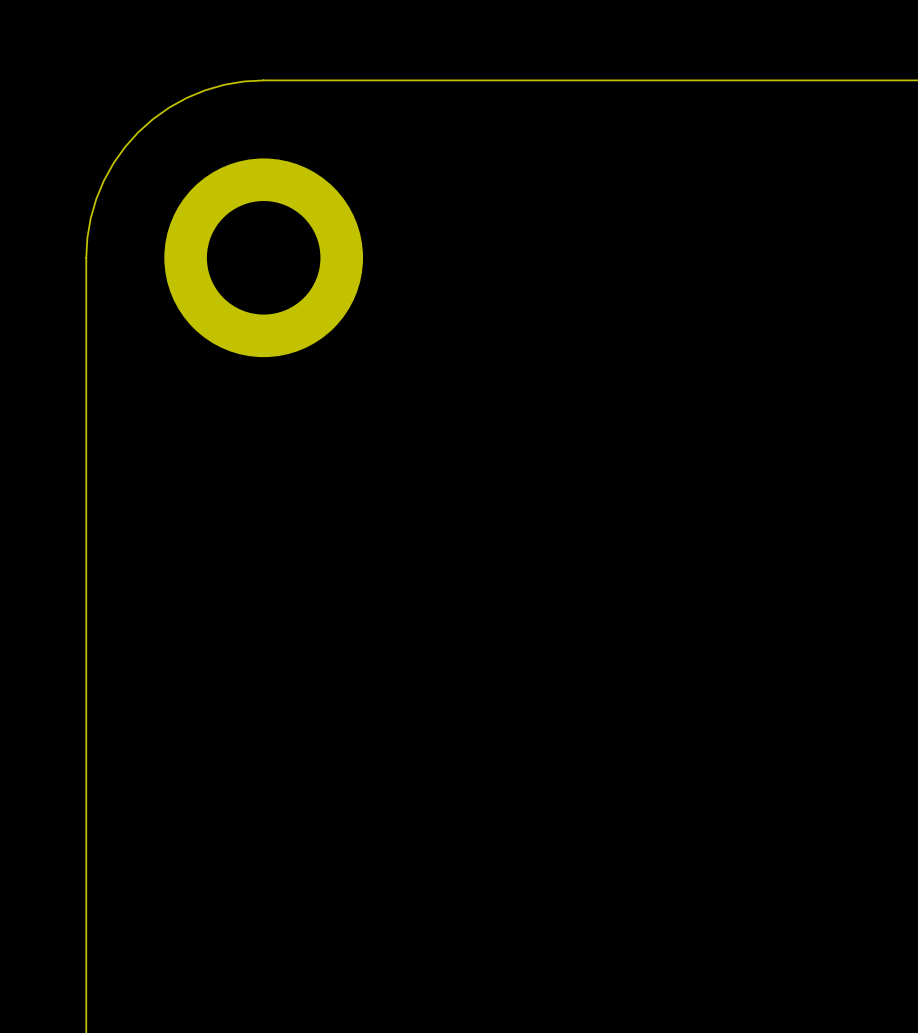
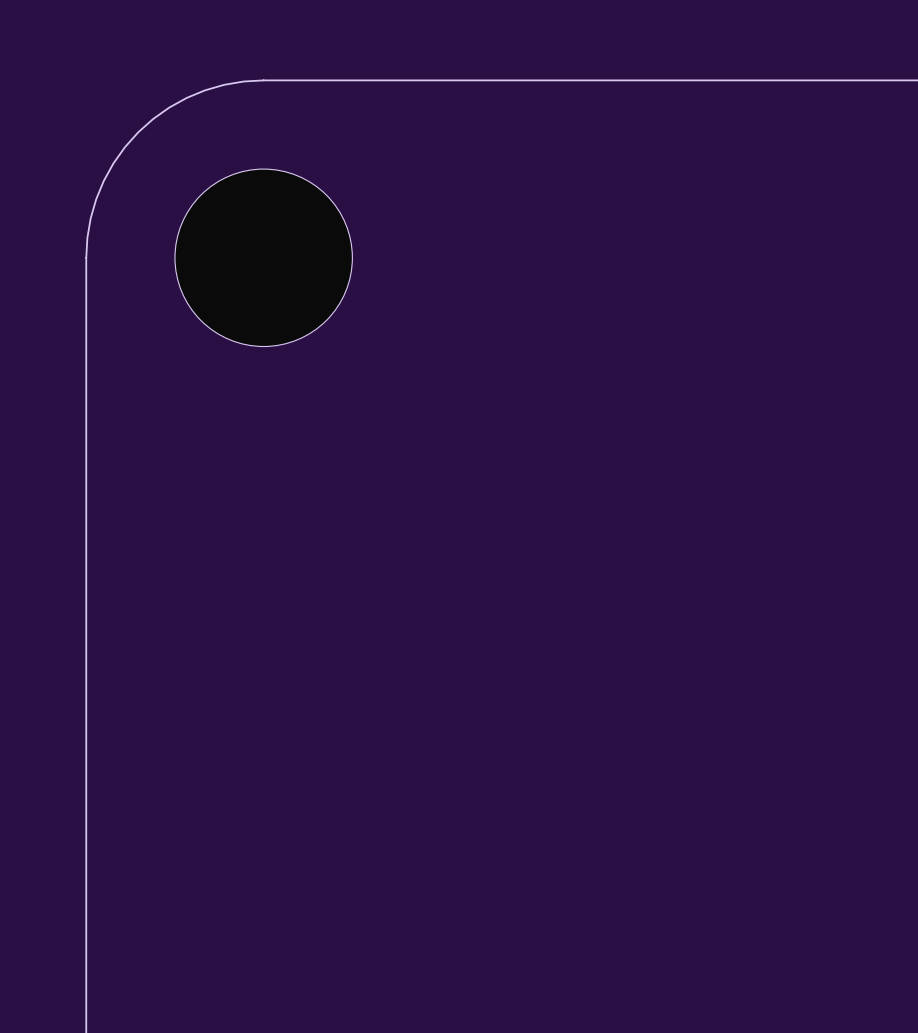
part footprint: [164, 158, 364, 358] -> [174, 169, 353, 347]

